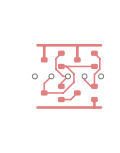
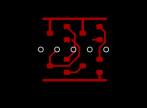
top track: (61, 53) (55, 58) (55, 69) (63, 76) (67, 76) (61, 83) (61, 86) -> (66, 26) (74, 34) (74, 51) (66, 59)
top track: (87, 66) (61, 66) -> none
top track: (84, 76) (84, 79) (91, 86) (94, 86) -> none

